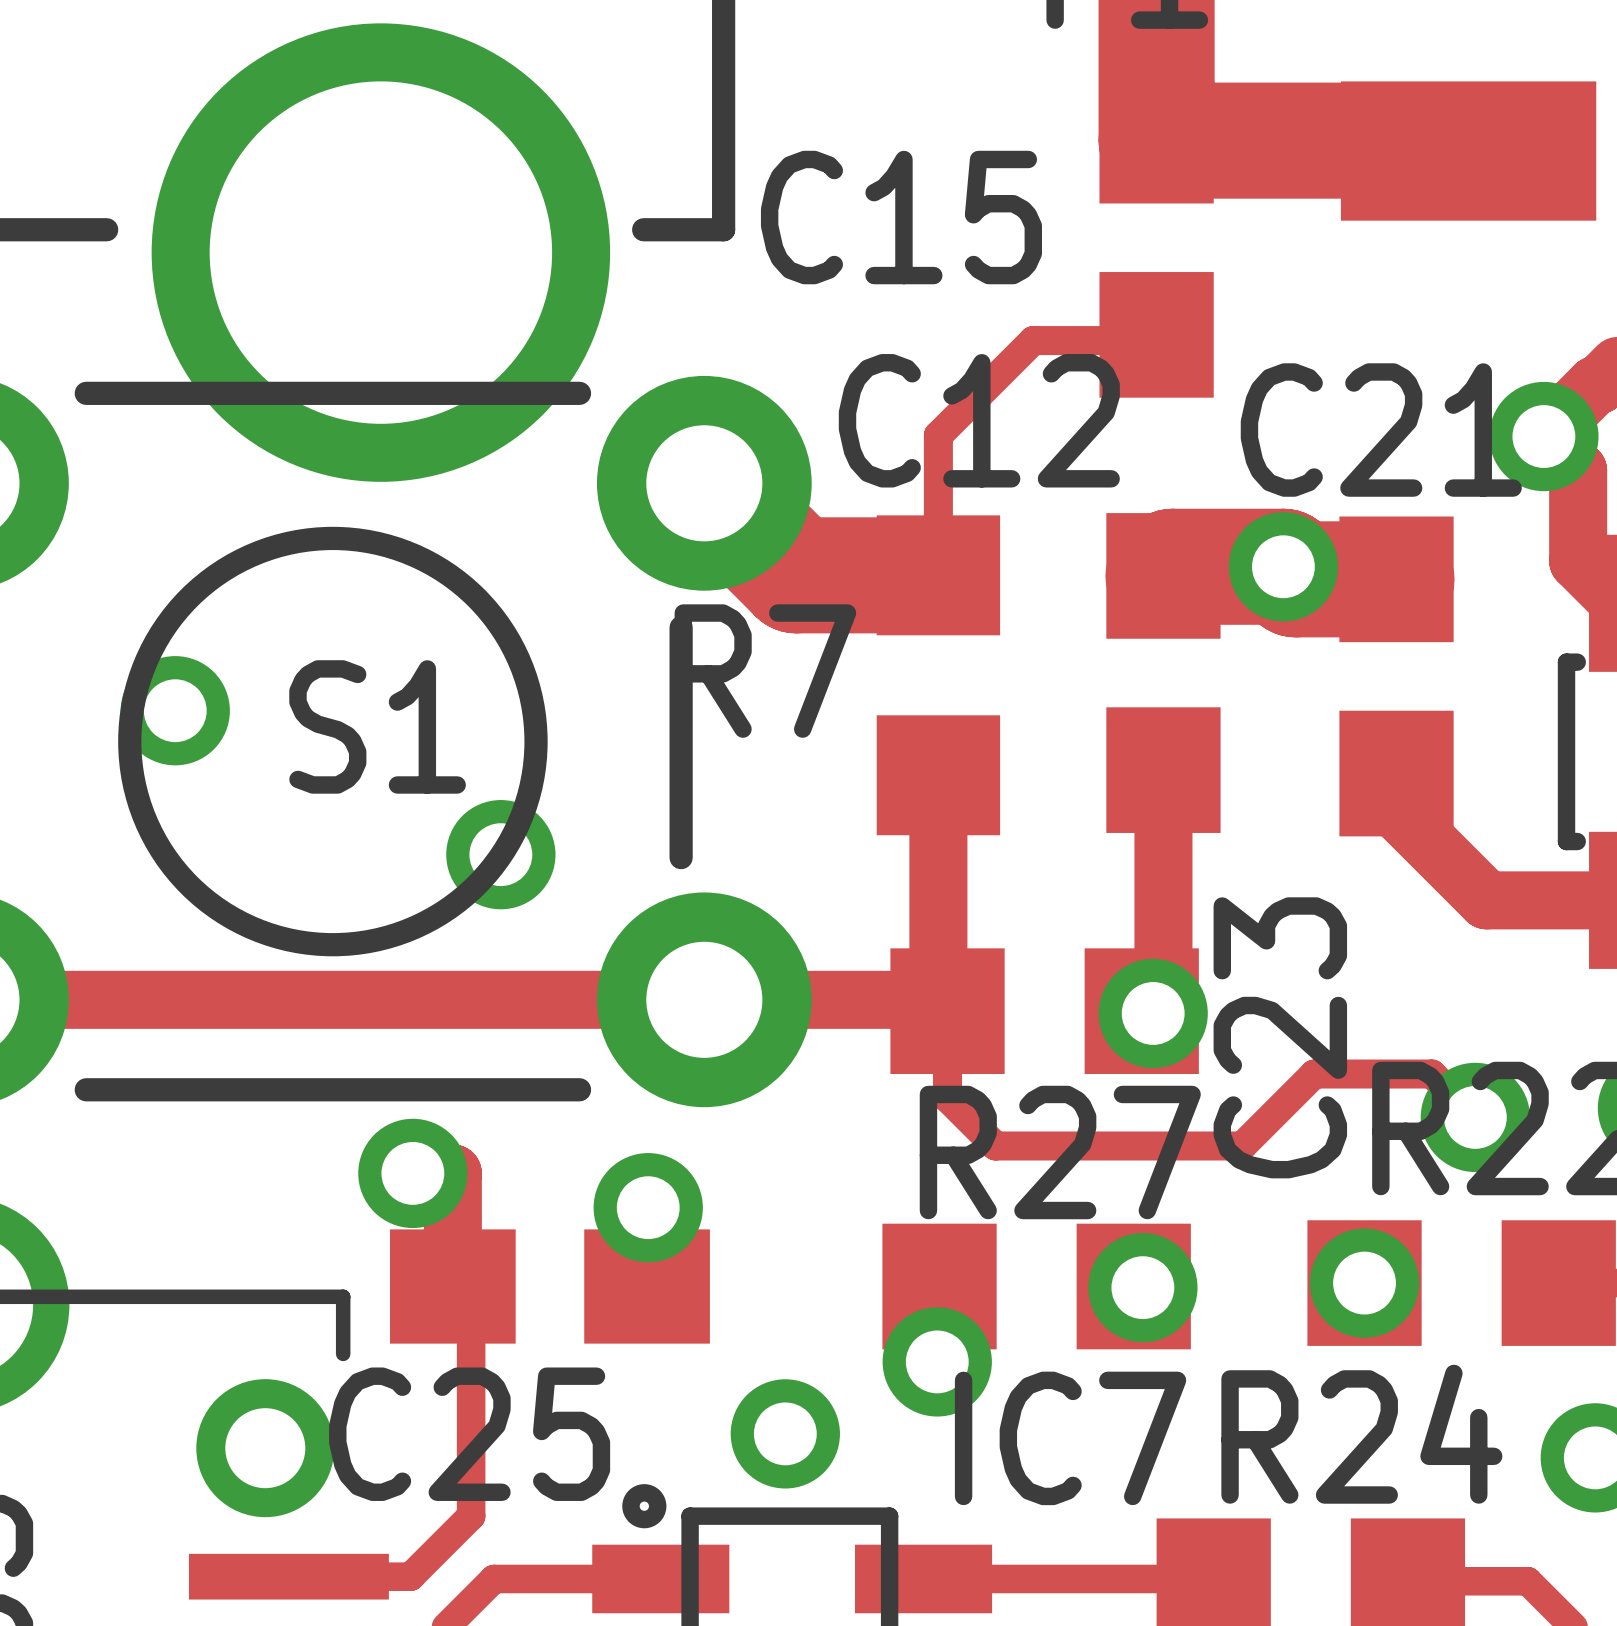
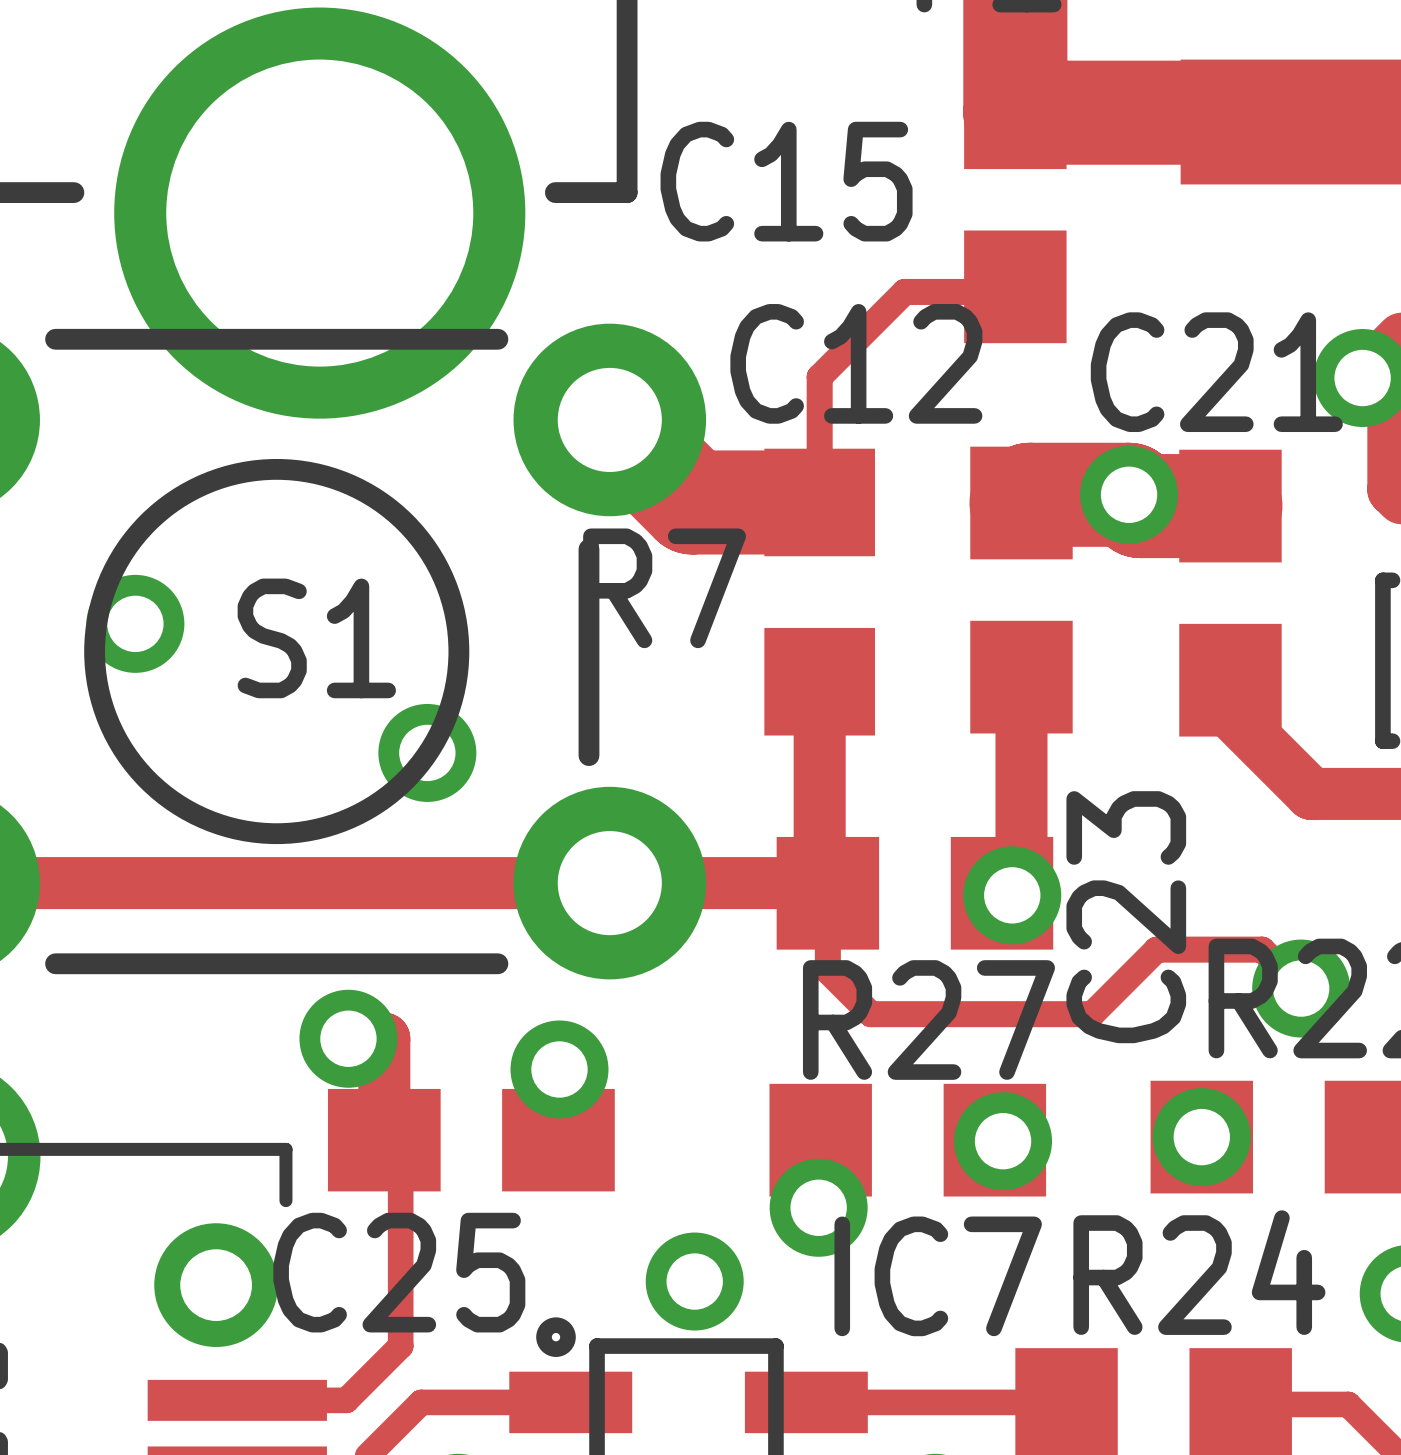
via position: (785, 1433) -> (694, 1281)

